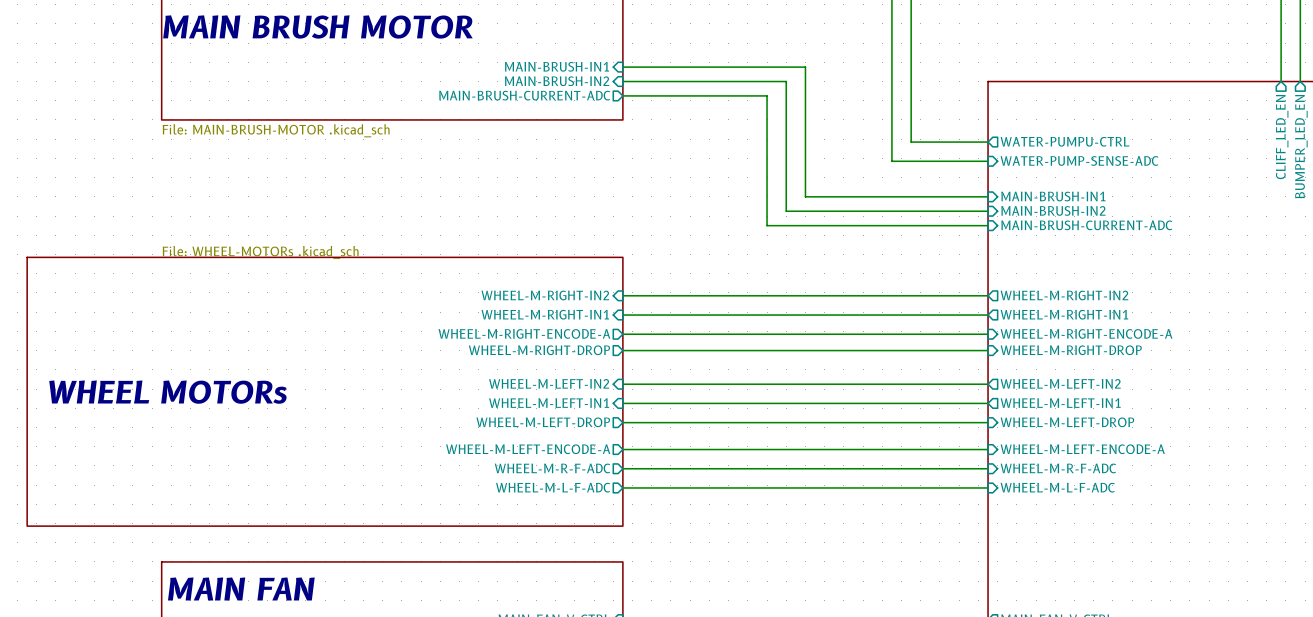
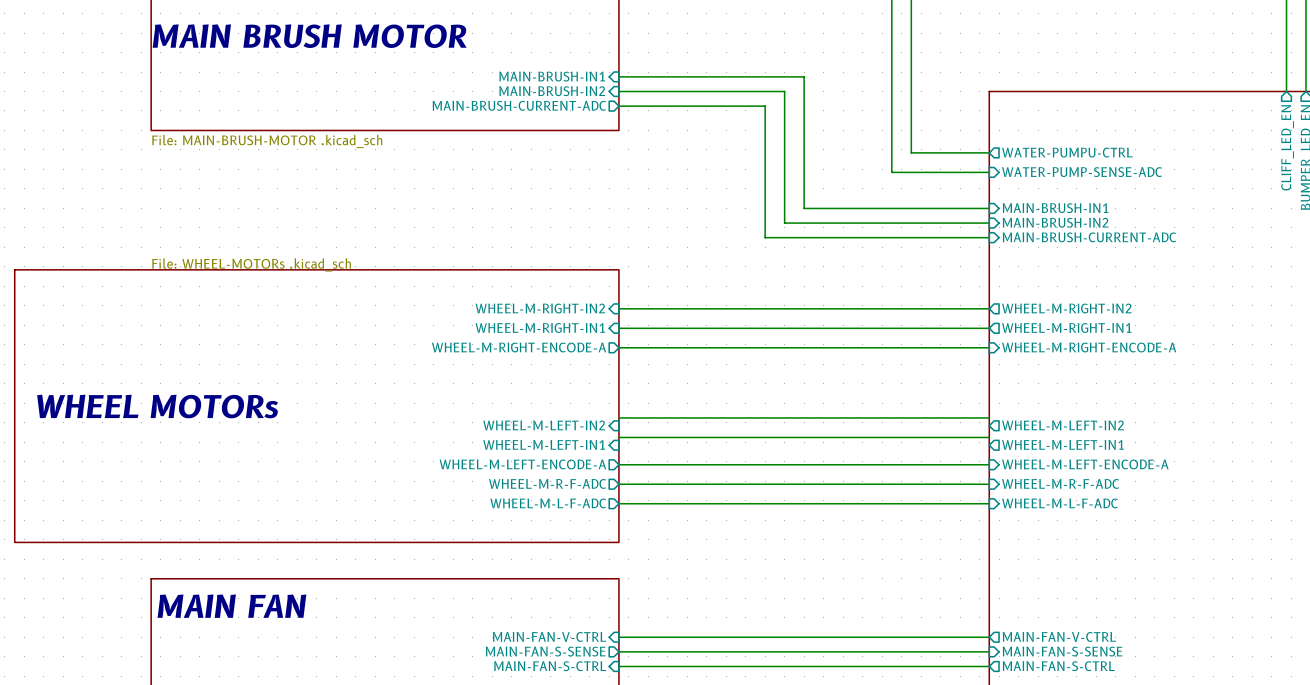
sheet pin: WHEEL-M-RIGHT-DROP (539, 350) -> none
wire: (622, 350) (988, 350) -> none
sheet pin: WHEEL-M-RIGHT-DROP (1071, 350) -> none
sheet pin position: WHEEL-M-LEFT-IN2 (549, 383) -> WHEEL-M-LEFT-IN2 (544, 425)
sheet pin position: WHEEL-M-LEFT-IN2 (1060, 383) -> WHEEL-M-LEFT-IN2 (1062, 425)
wire: (622, 384) (988, 384) -> none
sheet pin position: WHEEL-M-LEFT-IN1 (549, 403) -> WHEEL-M-LEFT-IN1 (544, 444)
sheet pin position: WHEEL-M-LEFT-IN1 (1060, 403) -> WHEEL-M-LEFT-IN1 (1062, 444)
sheet pin: WHEEL-M-LEFT-DROP (543, 422) -> none
sheet pin: WHEEL-M-LEFT-DROP (1067, 422) -> none

